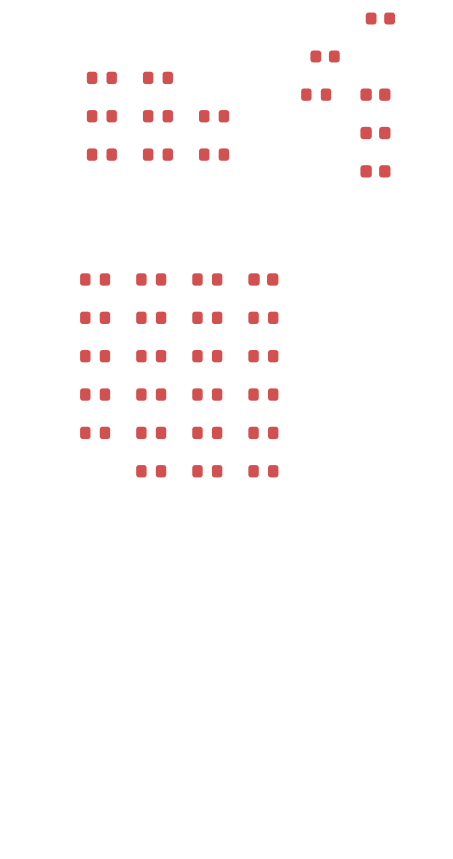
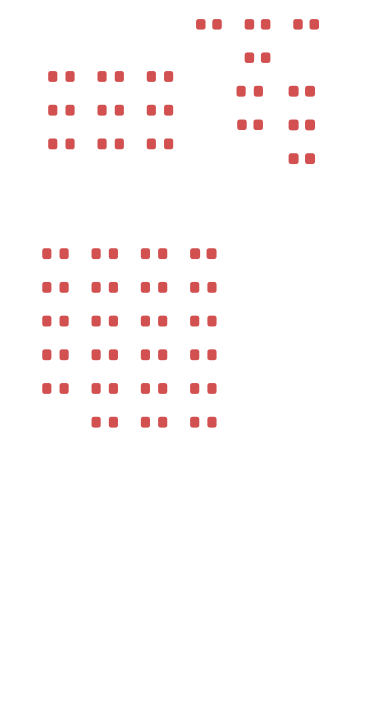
part: none -> (208, 24)
part: none -> (257, 24)
part: none -> (159, 76)
part: none -> (250, 124)

